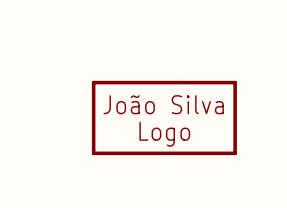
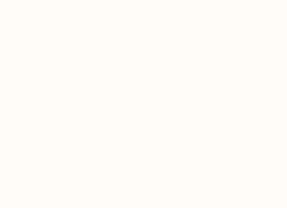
part: (164, 117) -> none

